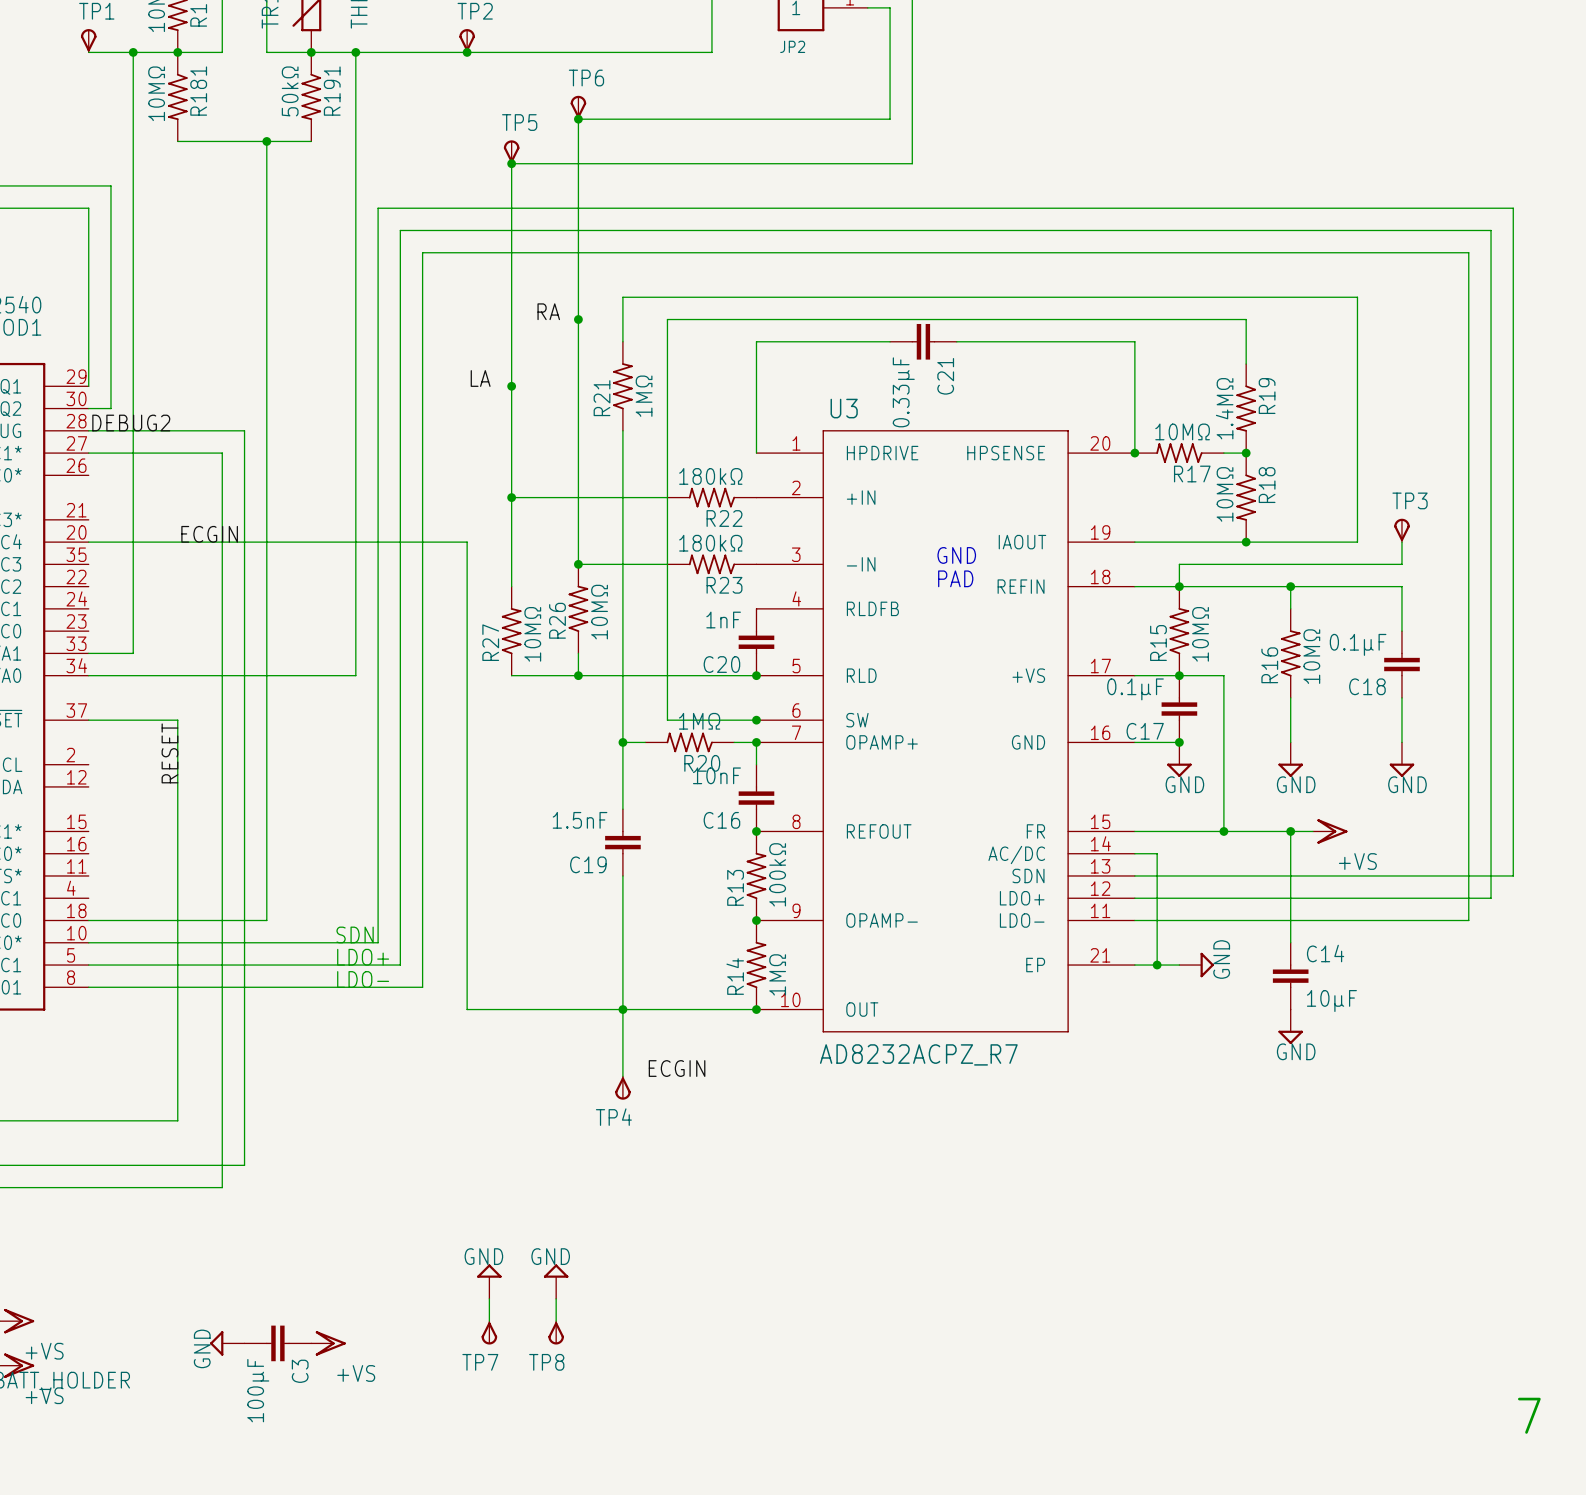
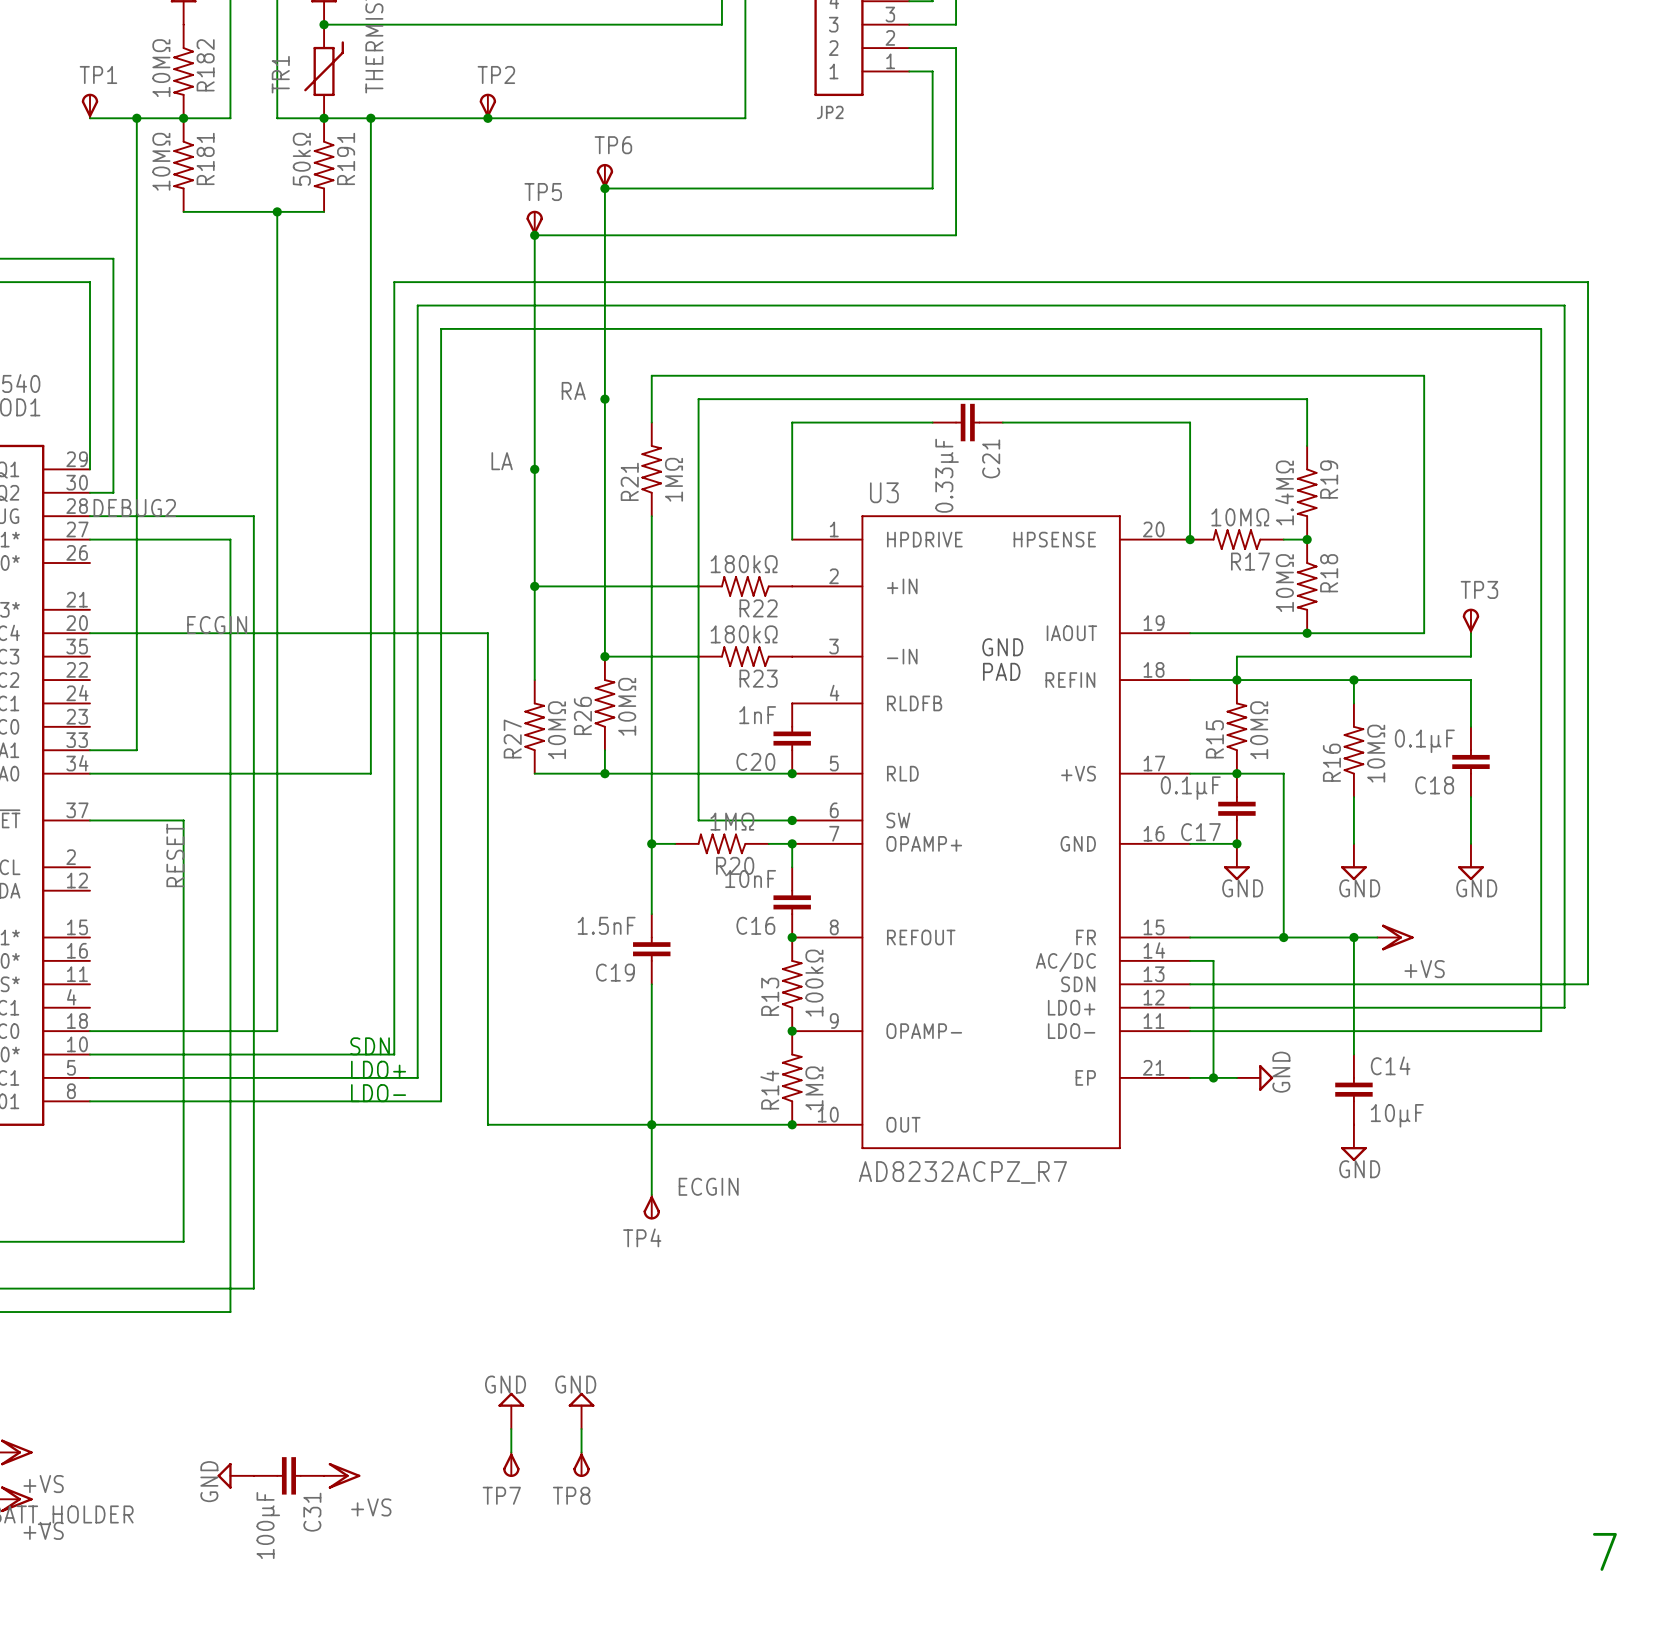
C3 name: C3 (300, 1371) -> C31 (312, 1512)

